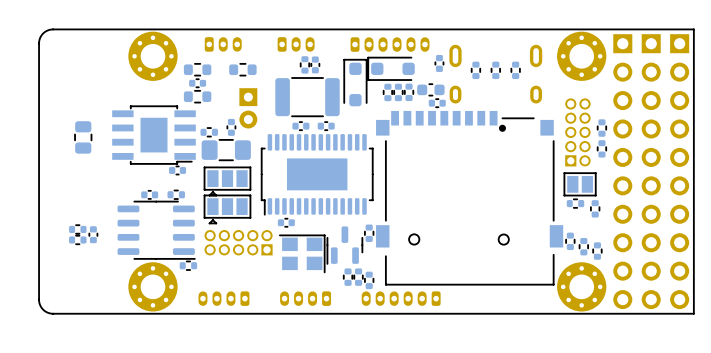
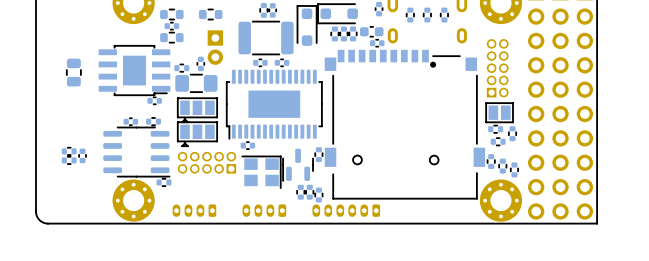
part: (601, 128) -> none
part: (601, 148) -> none
part: none -> (498, 141)

